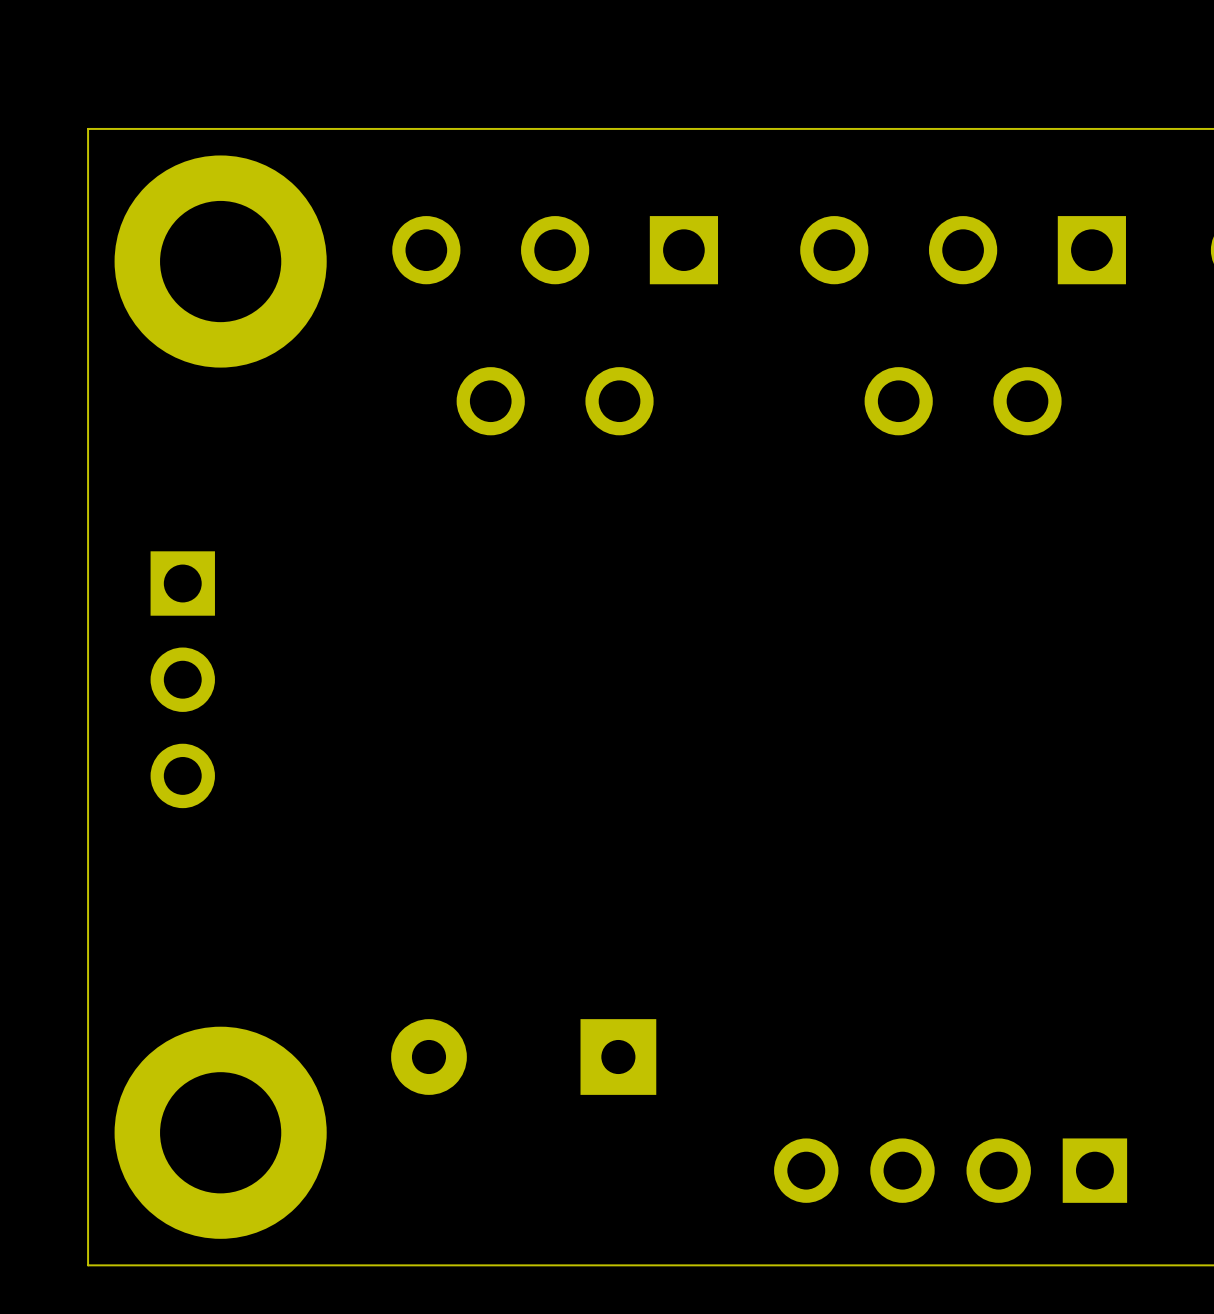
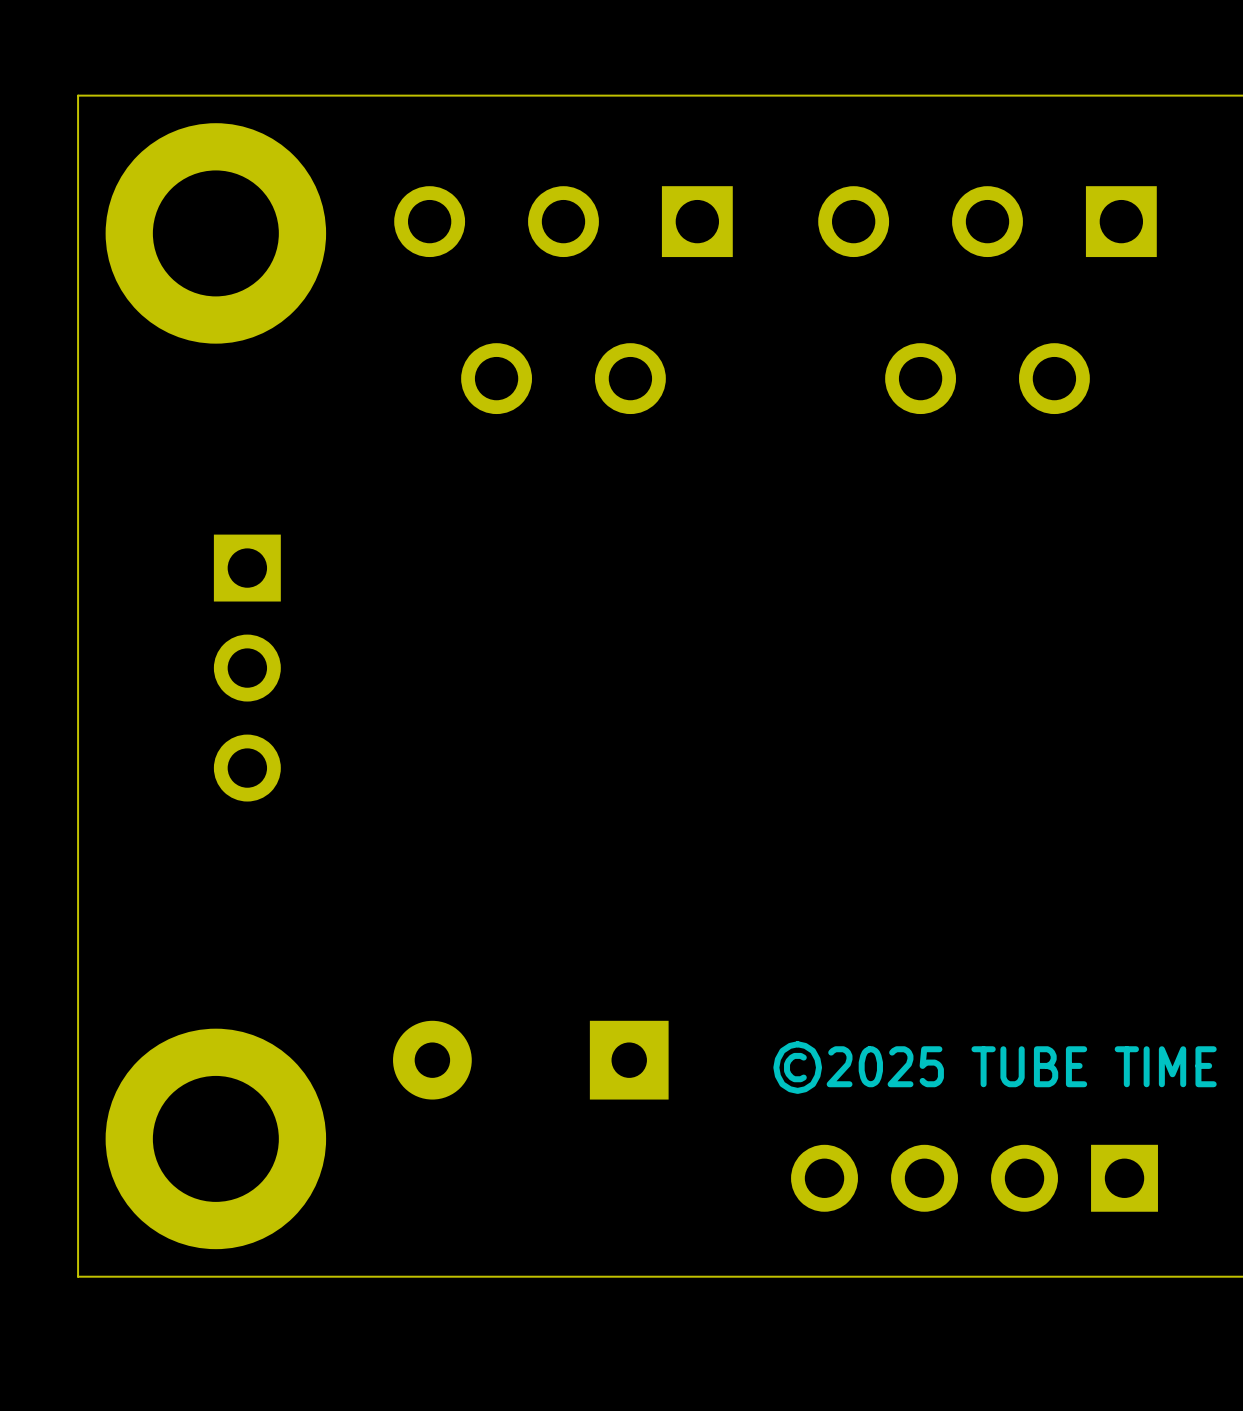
part position: (182, 679) -> (247, 668)
text: none -> ©2025 TUBE TIME (995, 1067)

